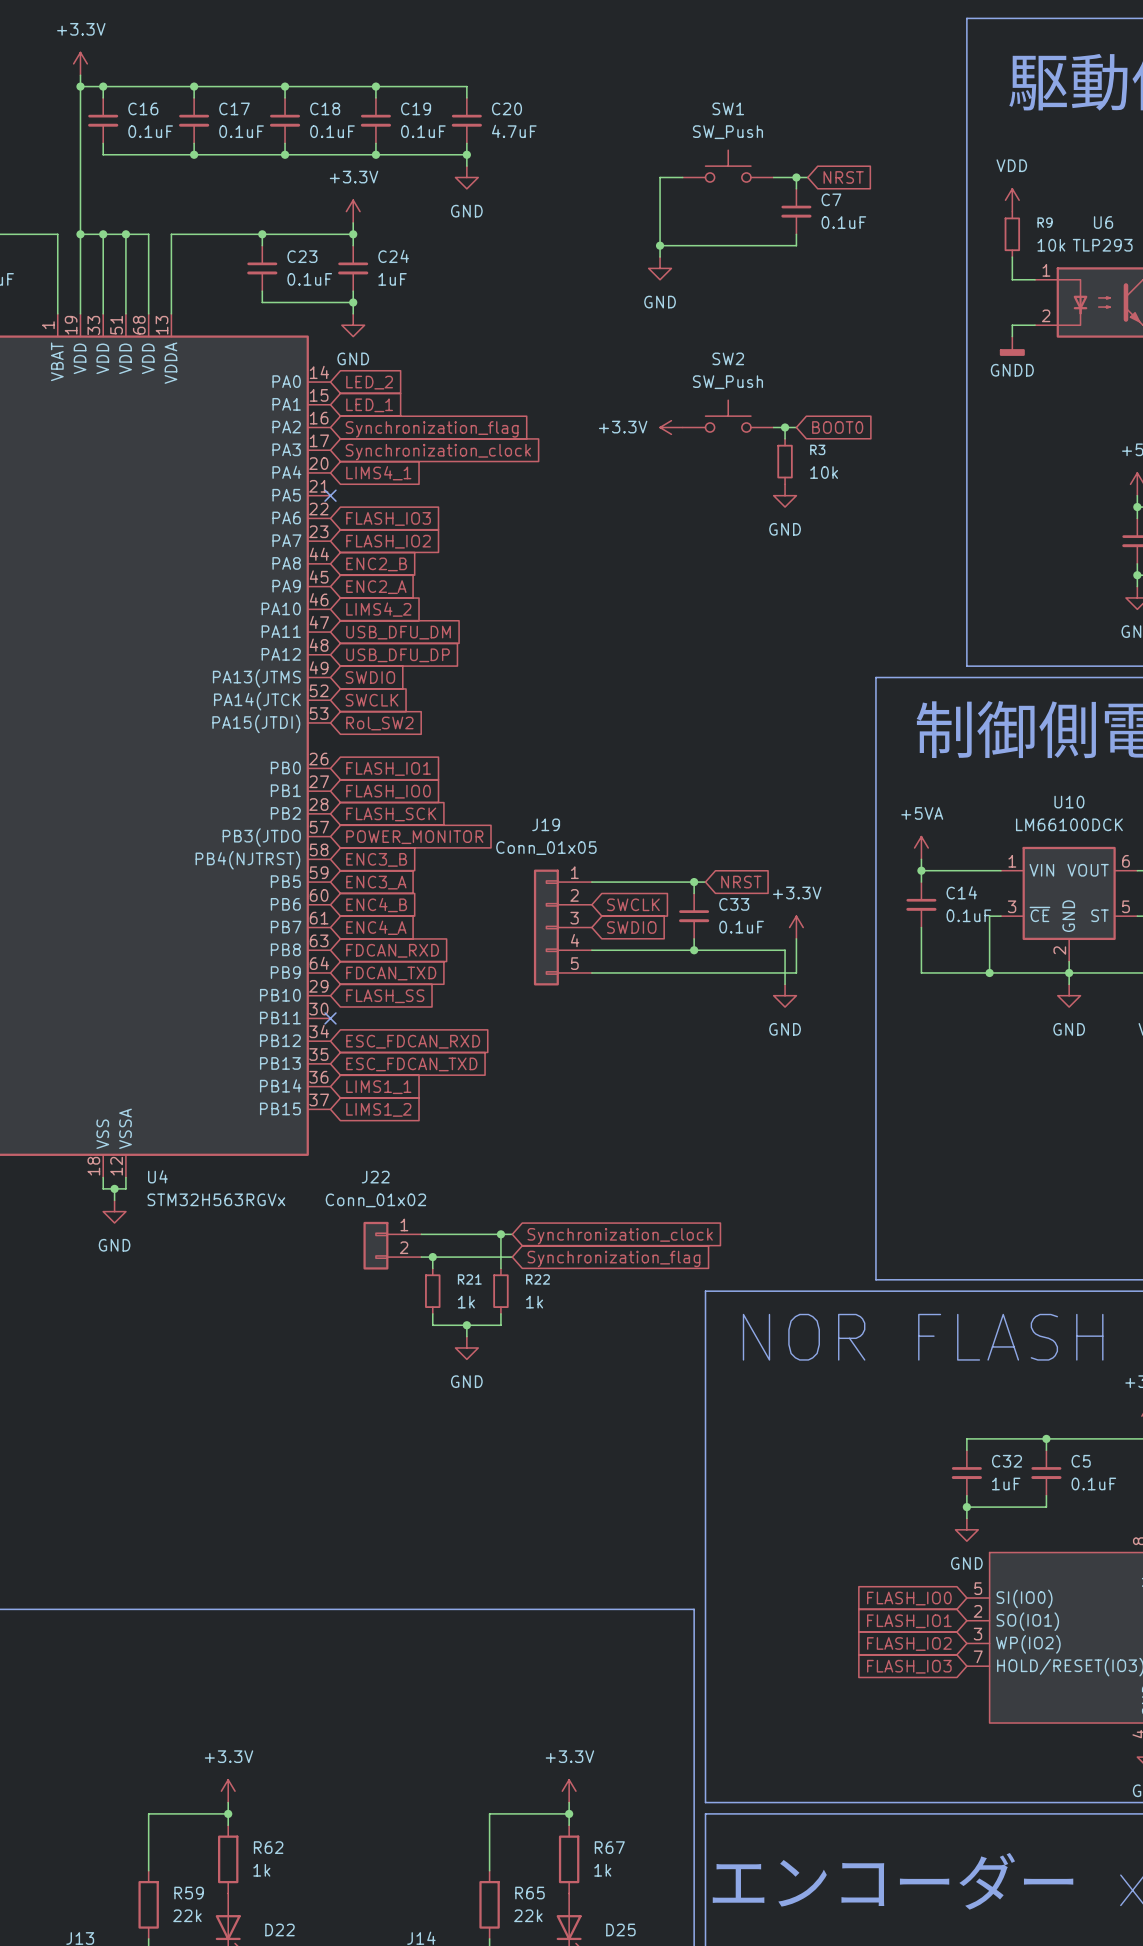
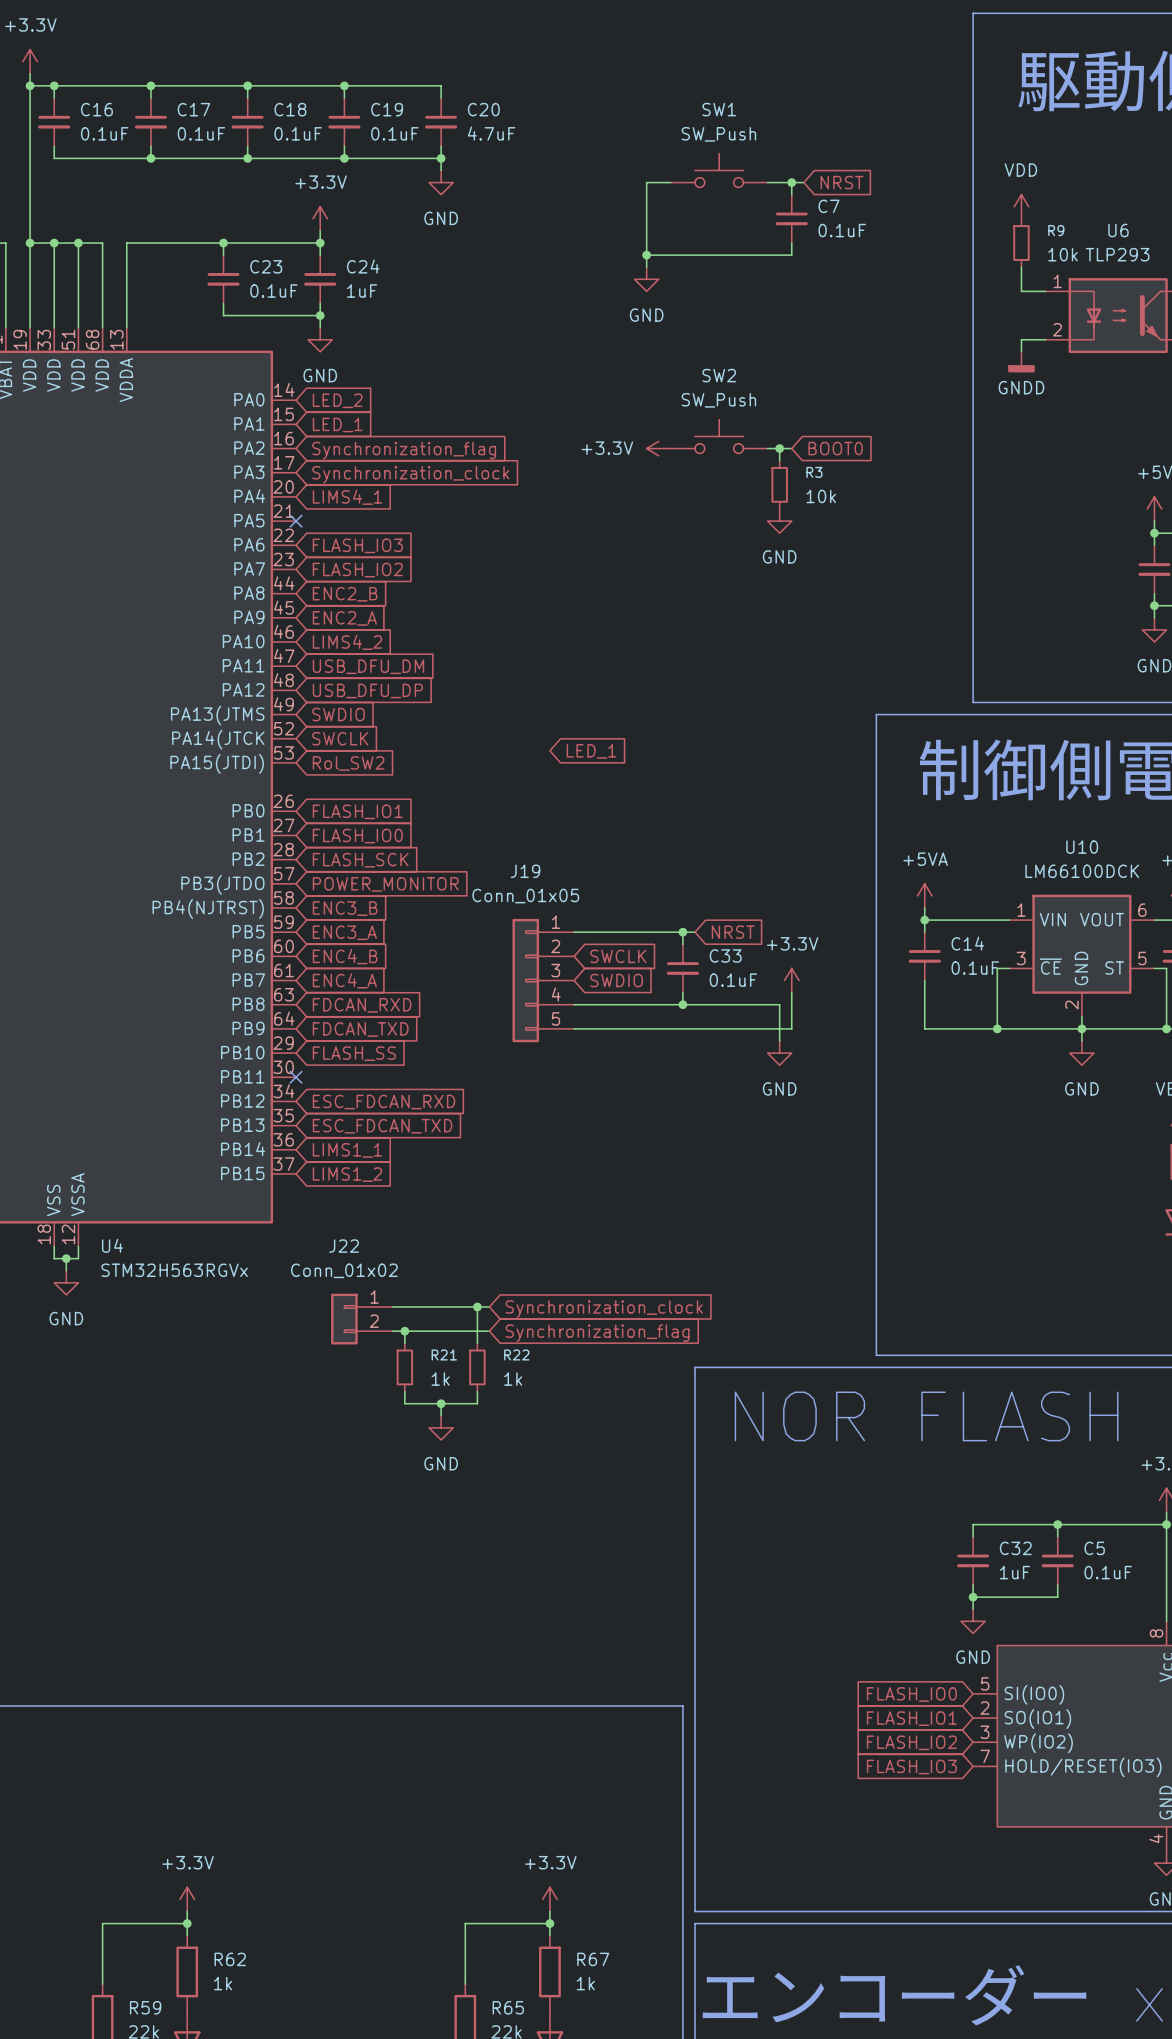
global label: none -> LED_1 (591, 751)

